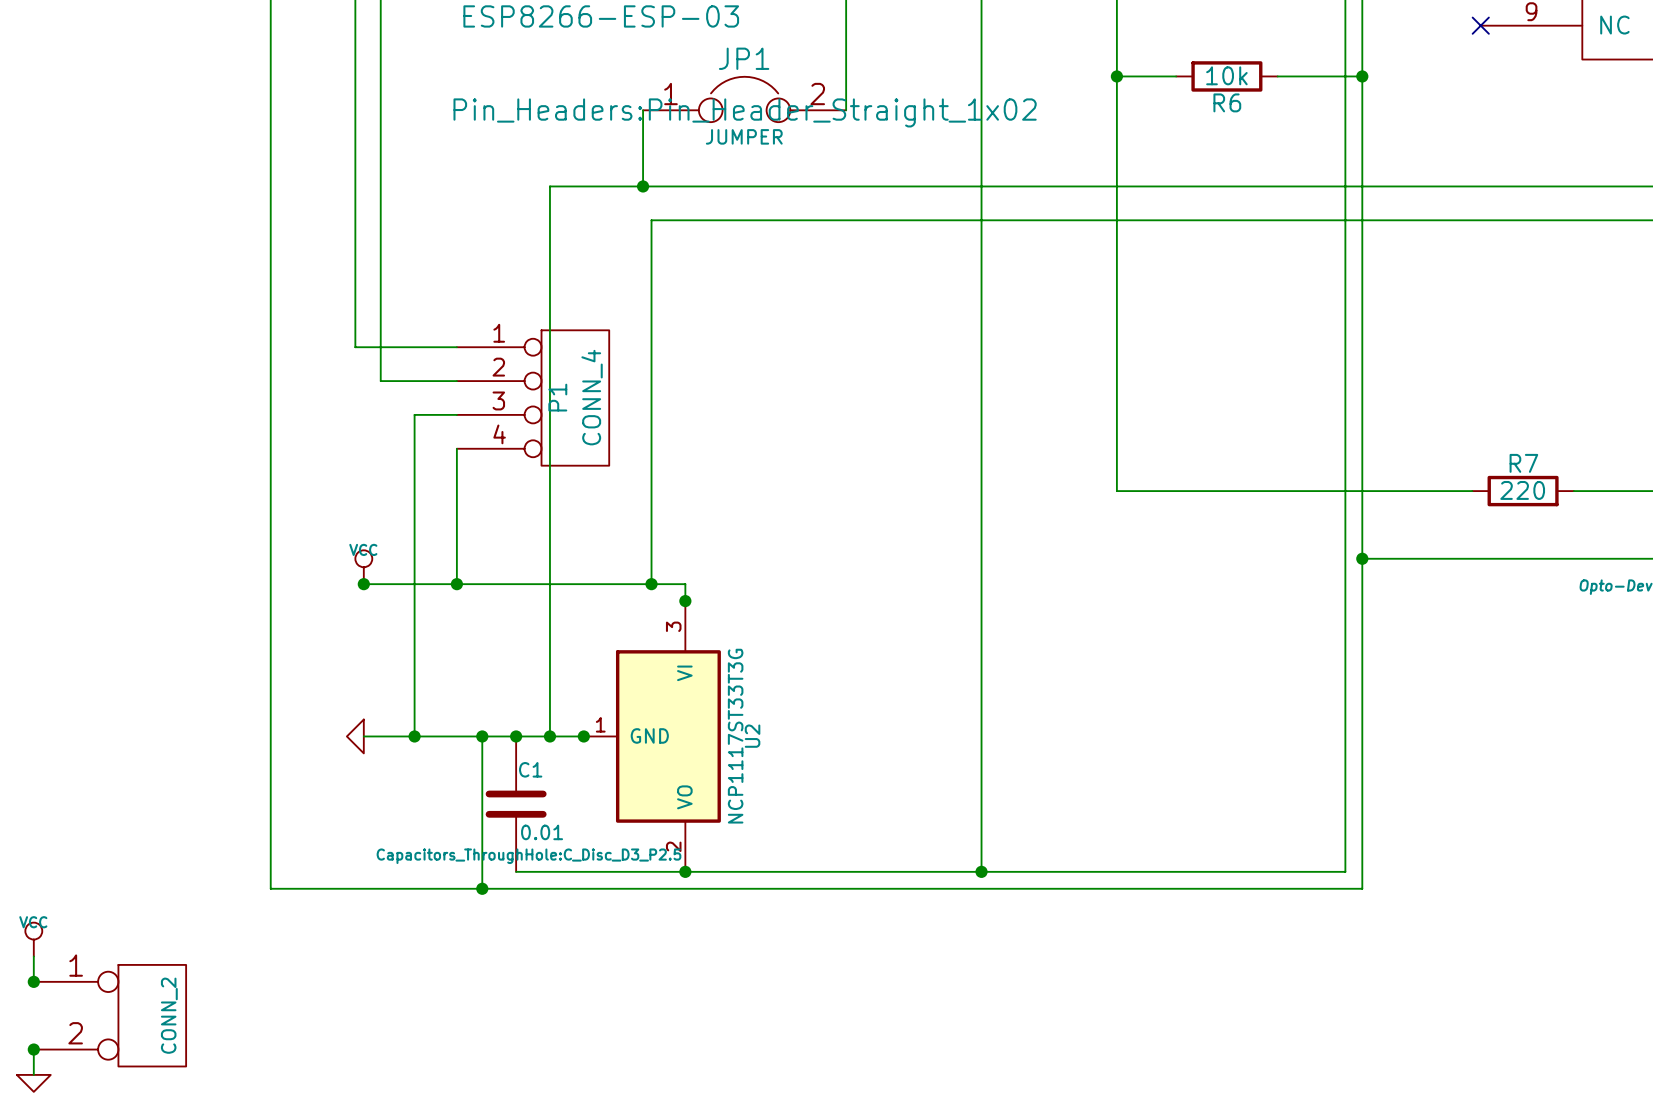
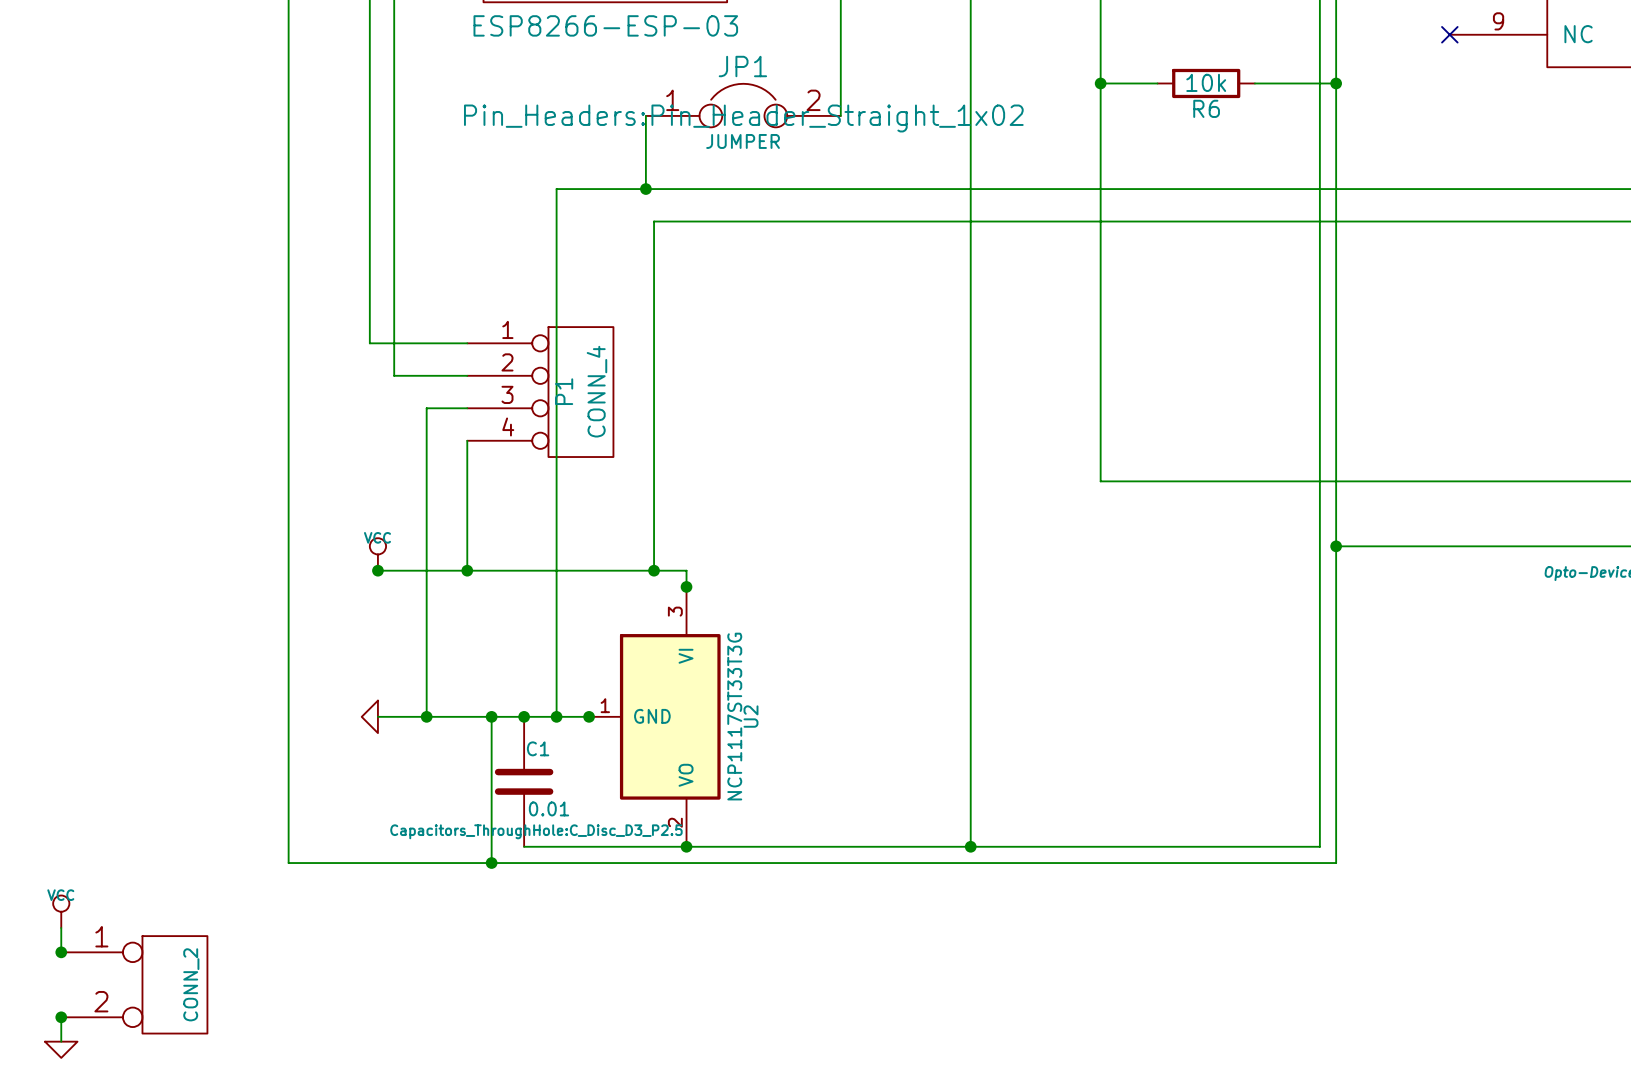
wire: none -> (1441, 481) (1539, 481)
R7: 220 (1523, 491) -> none

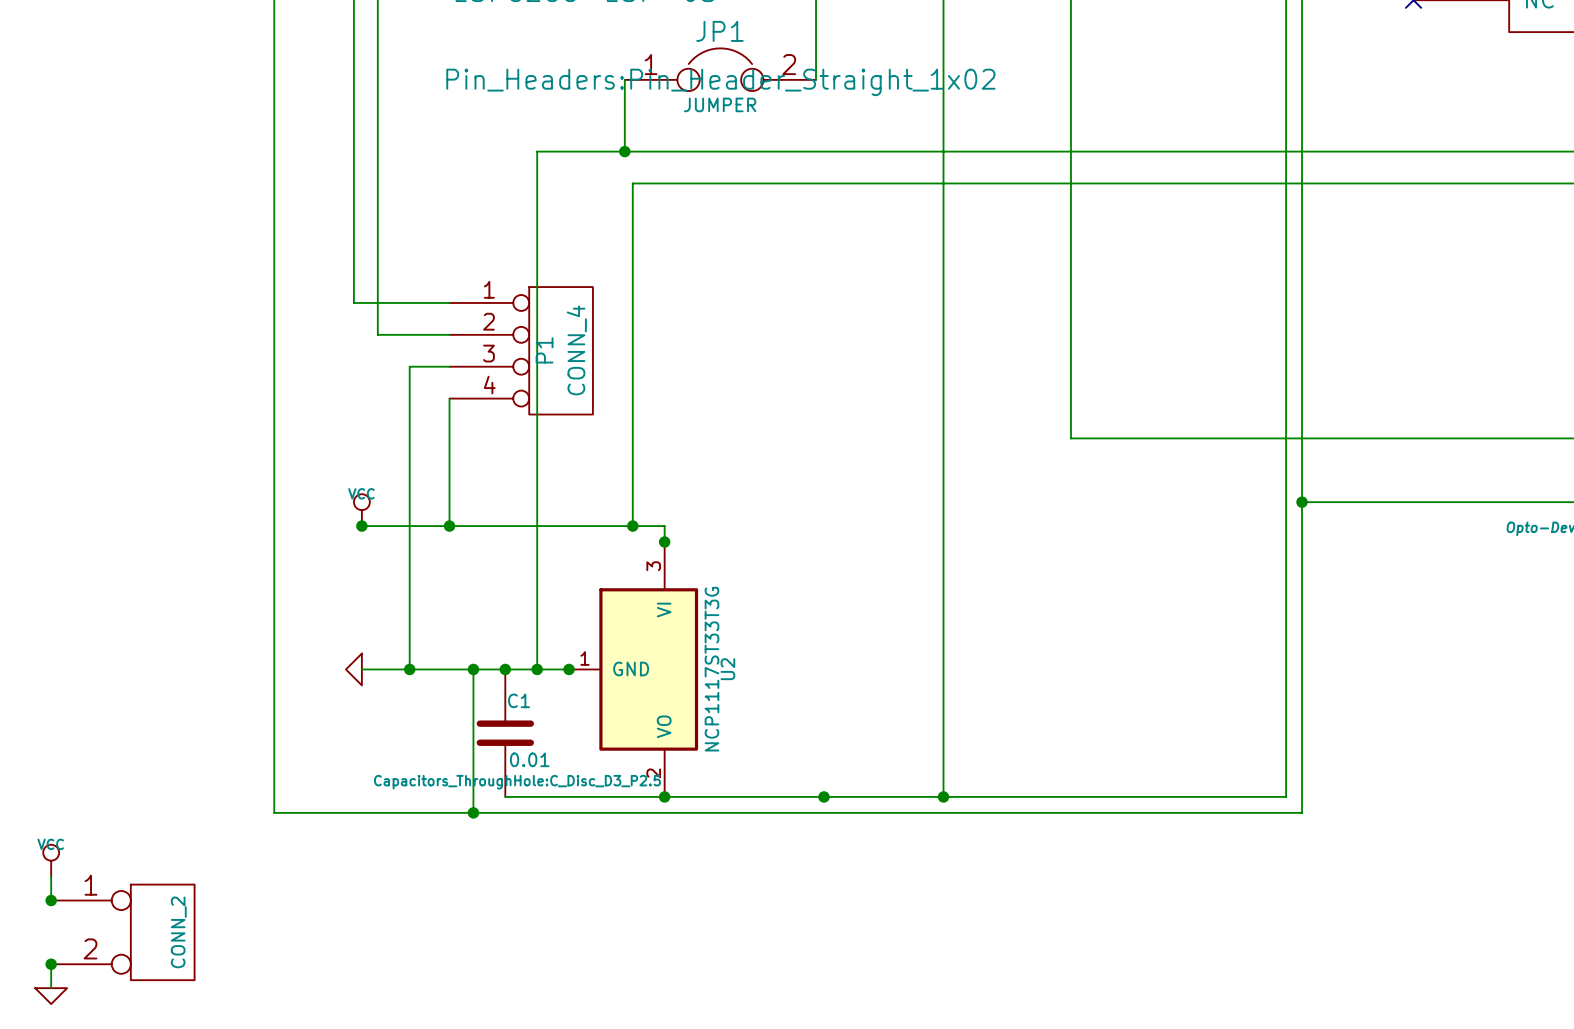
wire: (1100, 83) (1157, 83) -> none
junction: (1100, 83) -> none
R6: 10k (1206, 83) -> none
wire: (1254, 83) (1336, 83) -> none
junction: (1336, 83) -> none
junction: none -> (823, 796)

